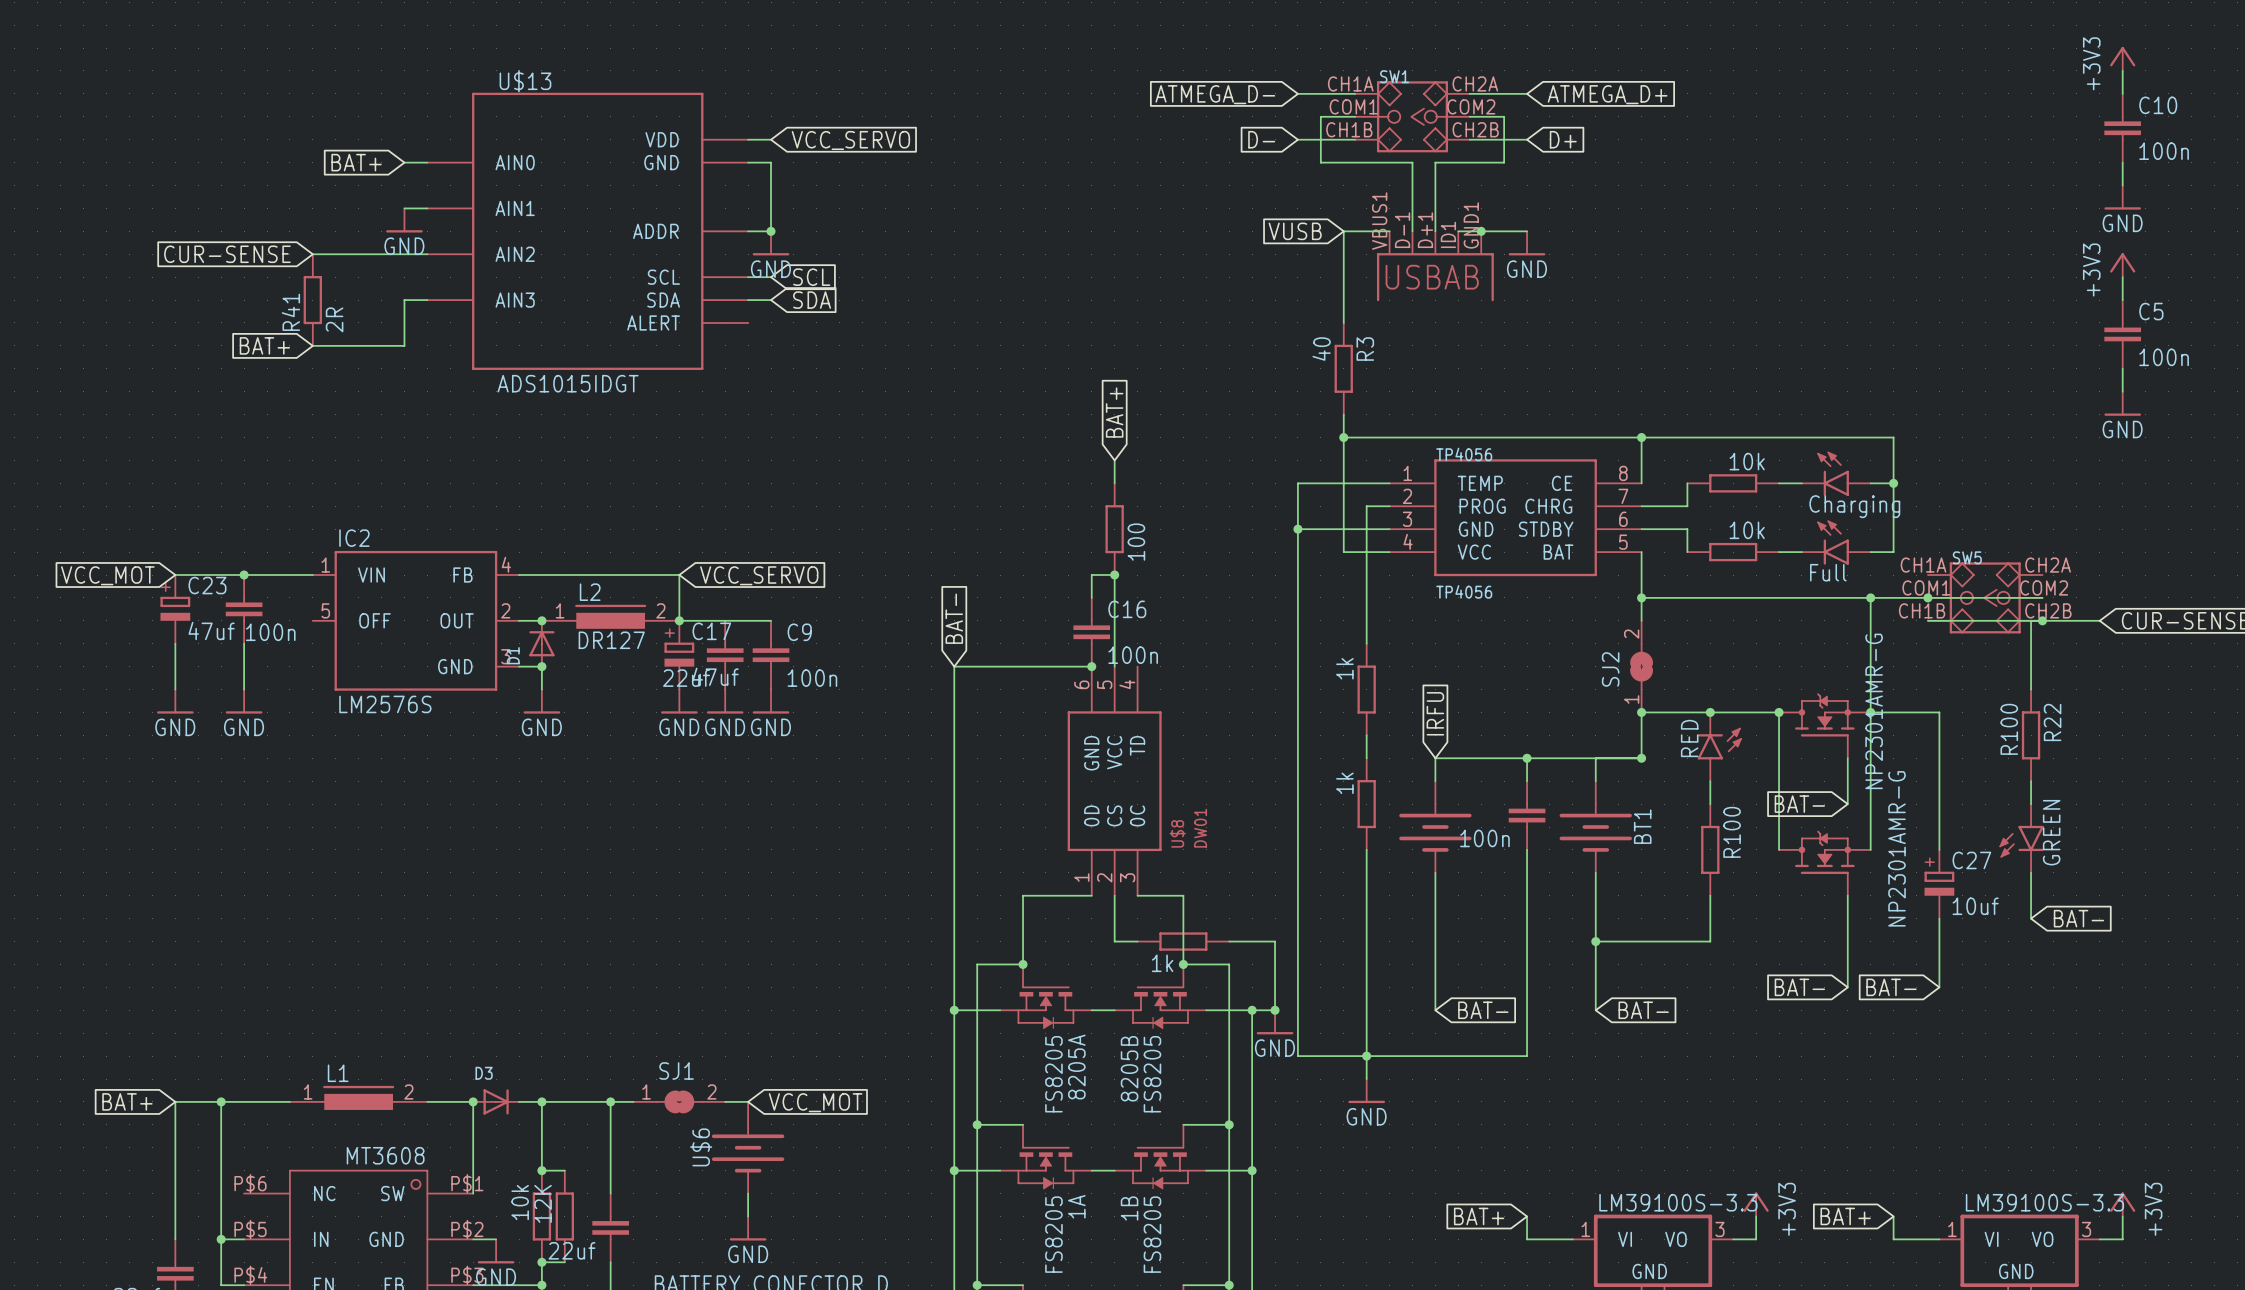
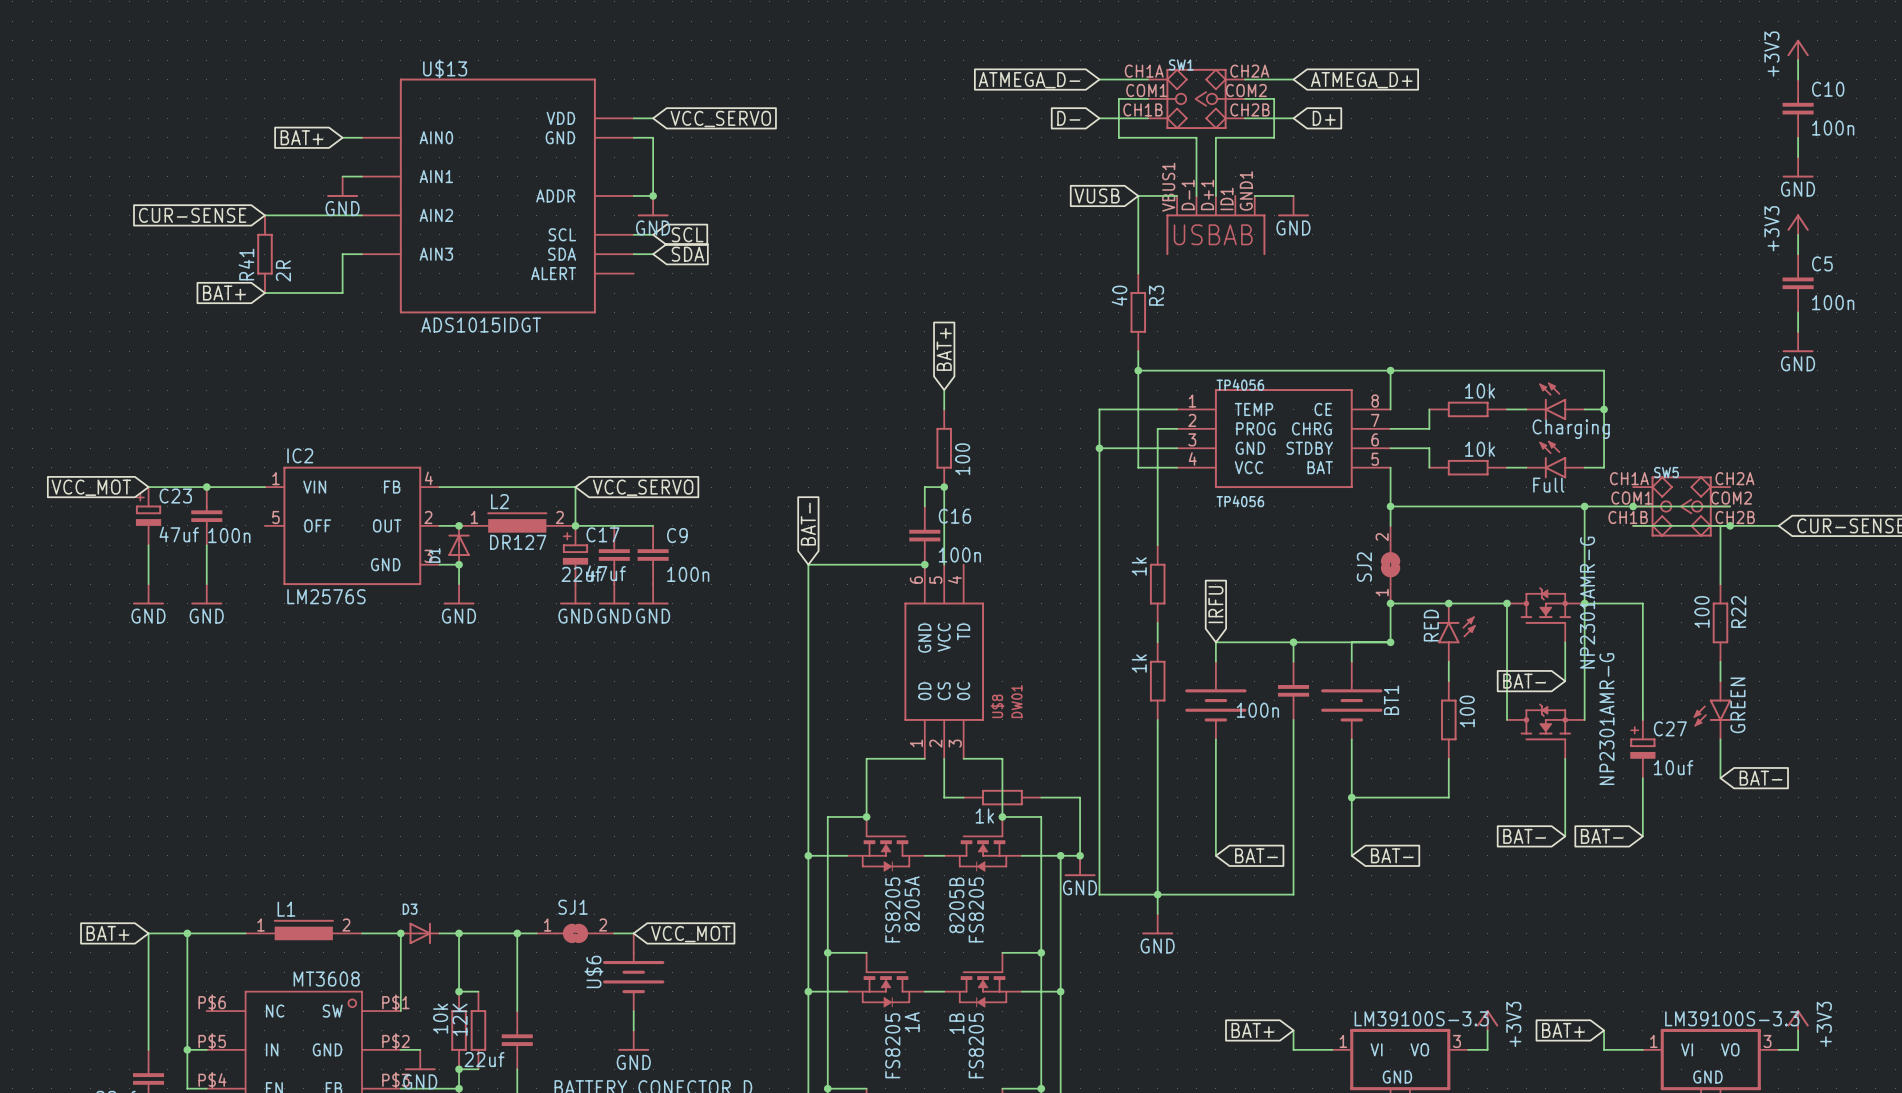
wire: (1458, 231) (1481, 231) -> none
junction: (1481, 231) -> none
R22 value: R100 (2009, 729) -> 100 (1702, 611)
part value: R100 (1732, 832) -> 100 (1467, 711)

